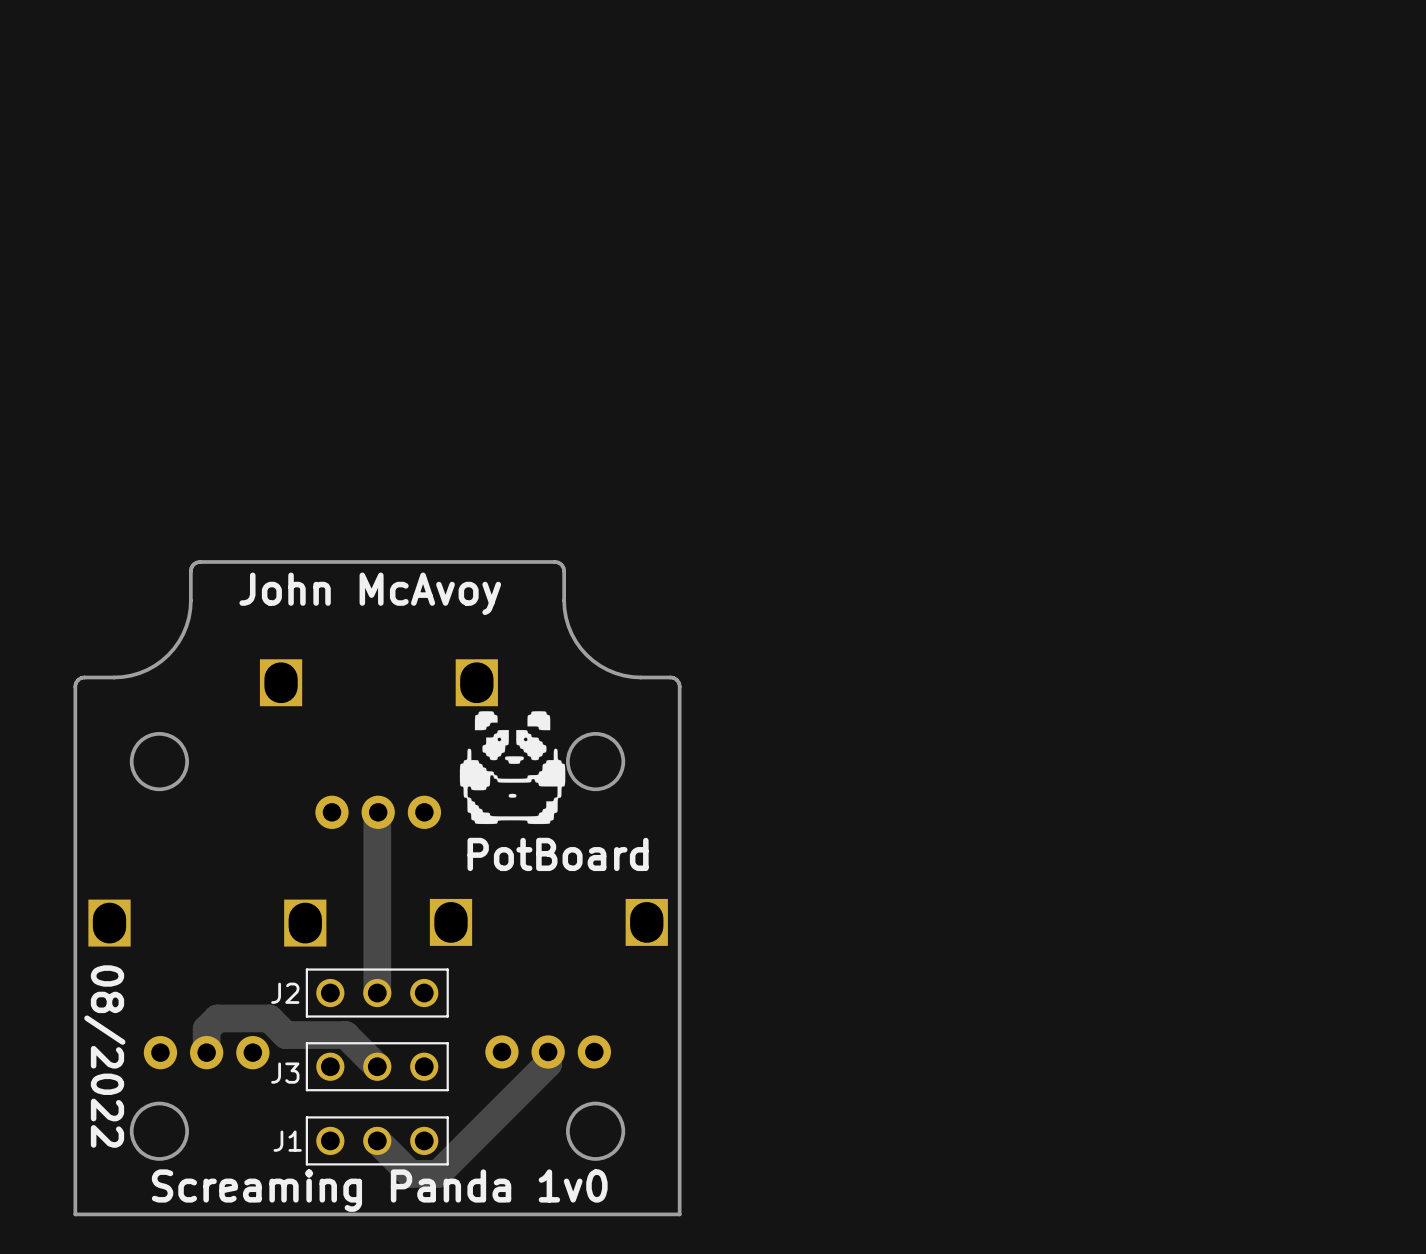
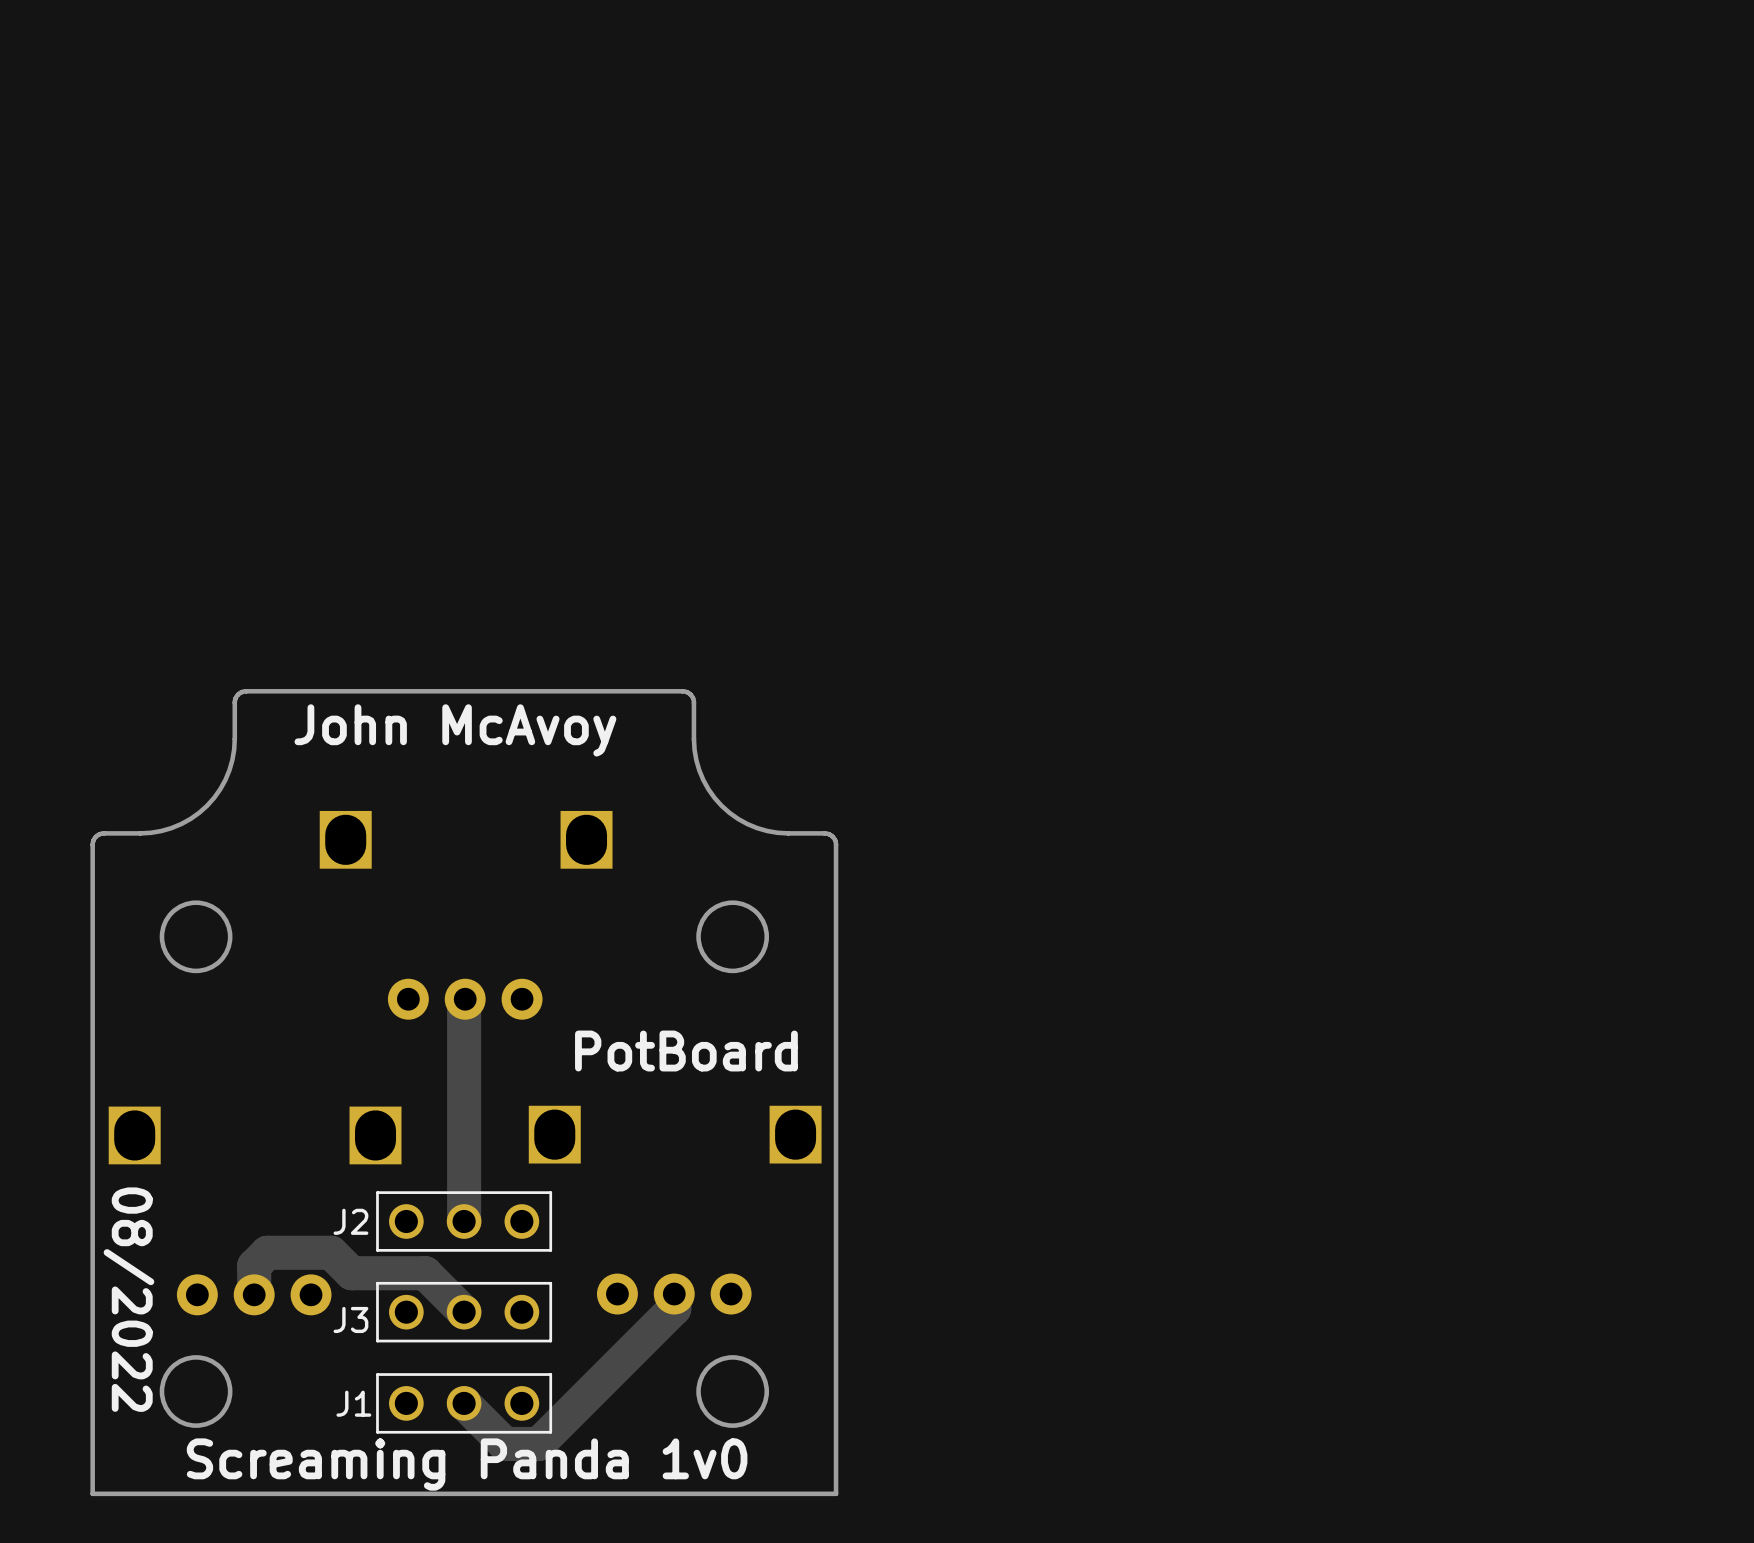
drawing: [459, 711, 566, 825] -> none

